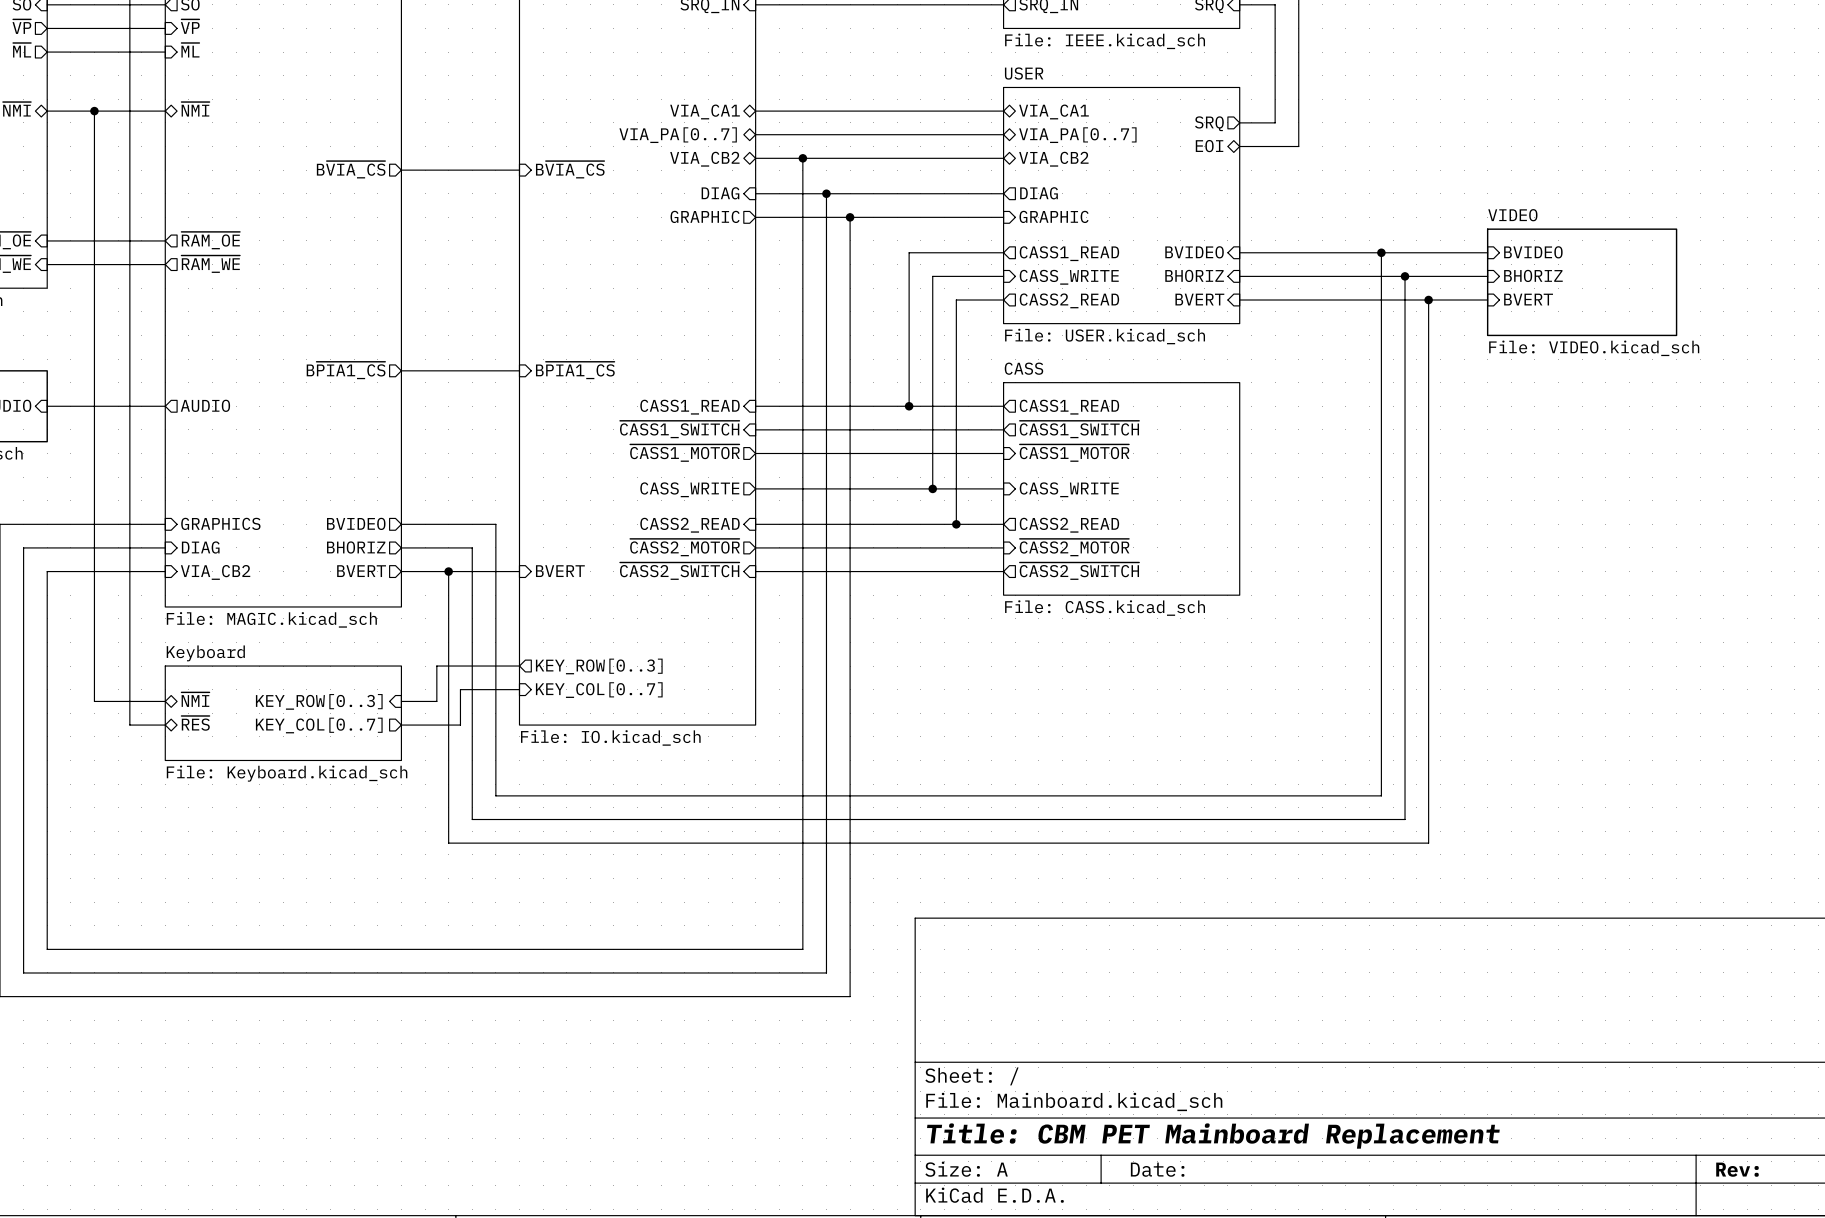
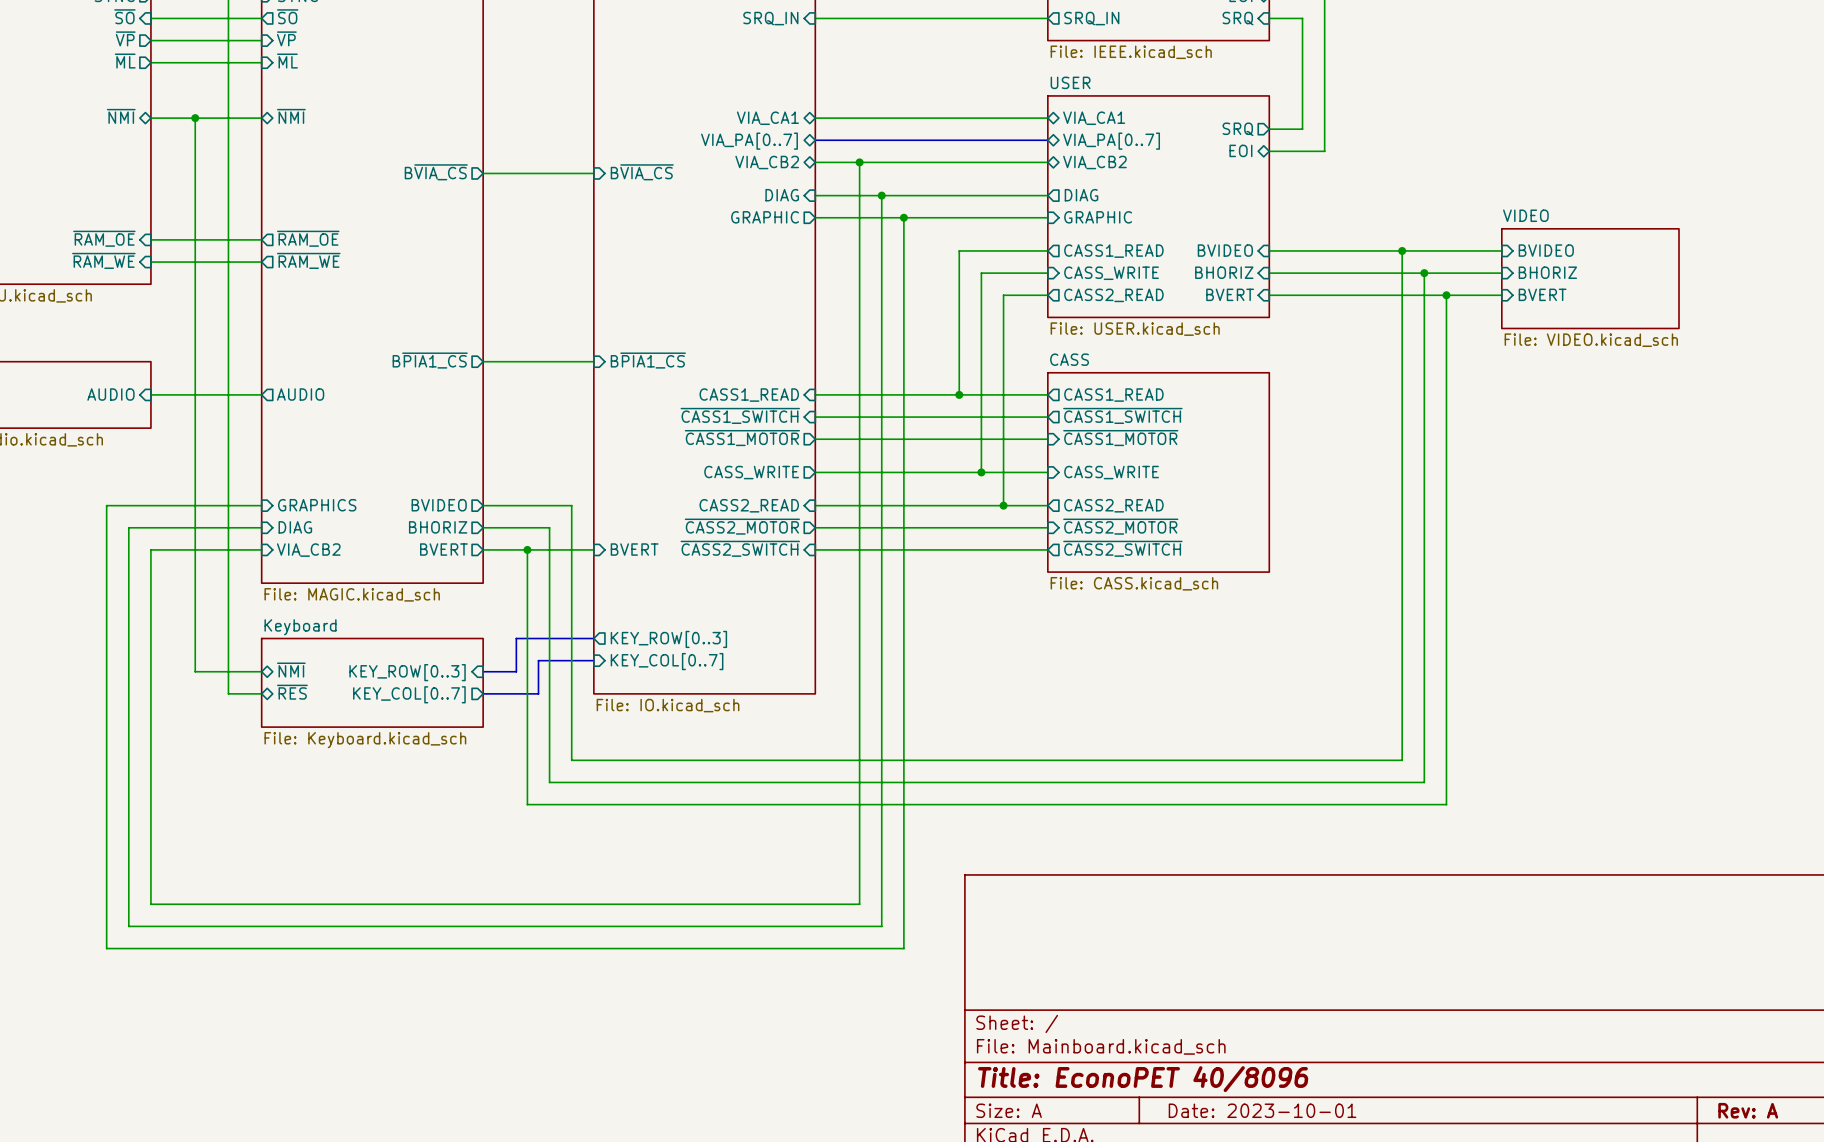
title block: Title: CBM PET Mainboard Replacement (1213, 1136) -> Title: EconoPET 40/8096 (1143, 1079)
title block: Date: (1157, 1169) -> Date: 2023-10-01 (1262, 1110)
title block: Rev: (1737, 1169) -> Rev: A (1748, 1110)

